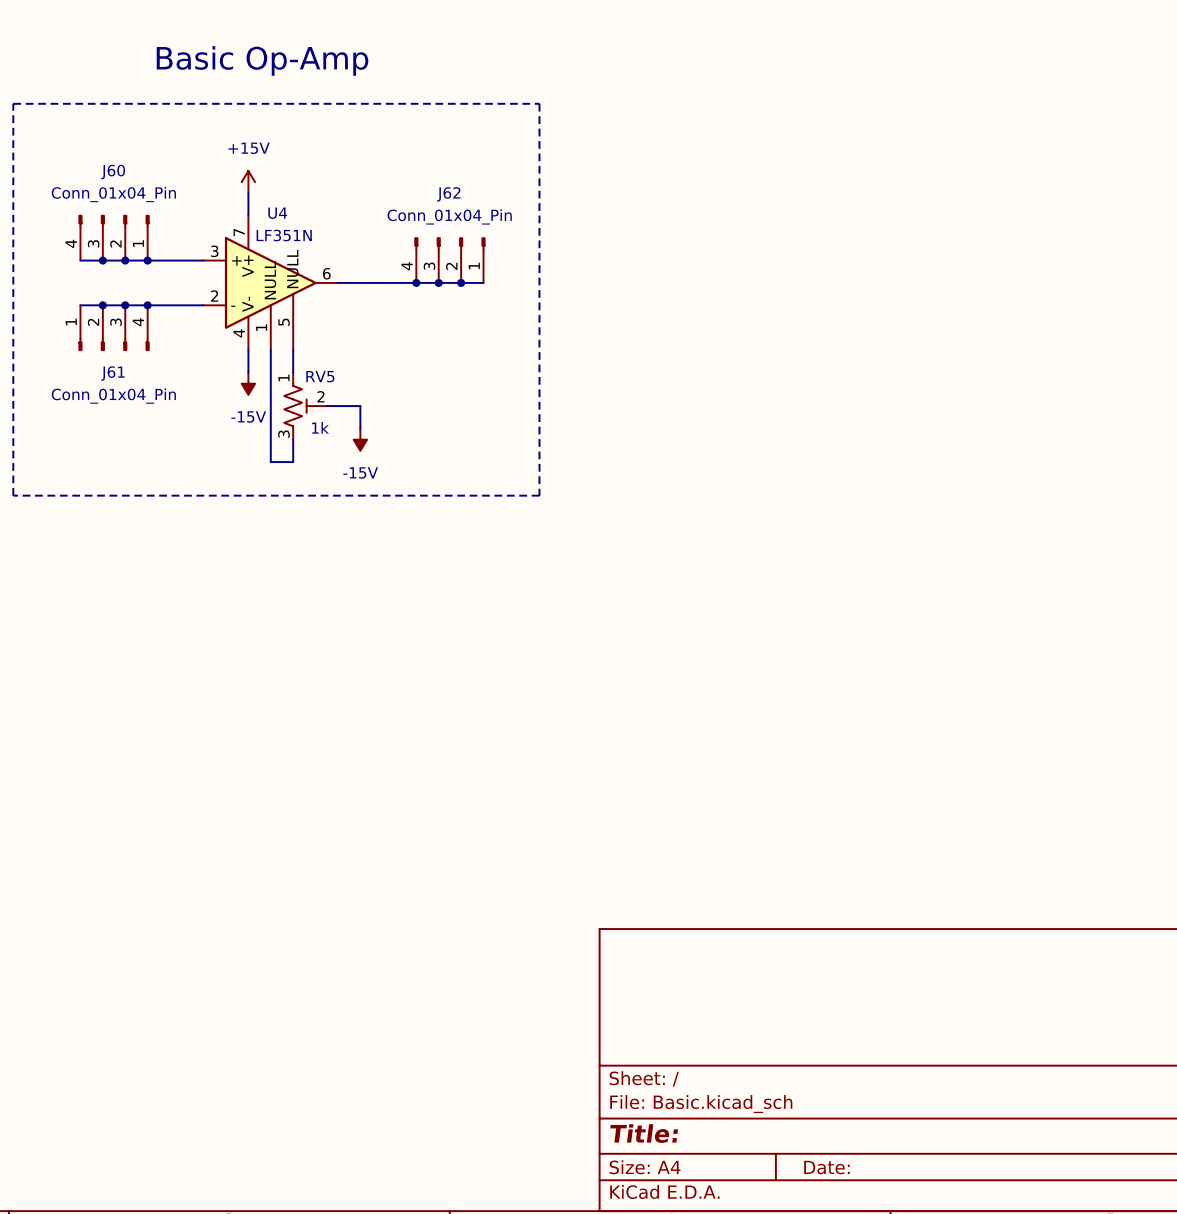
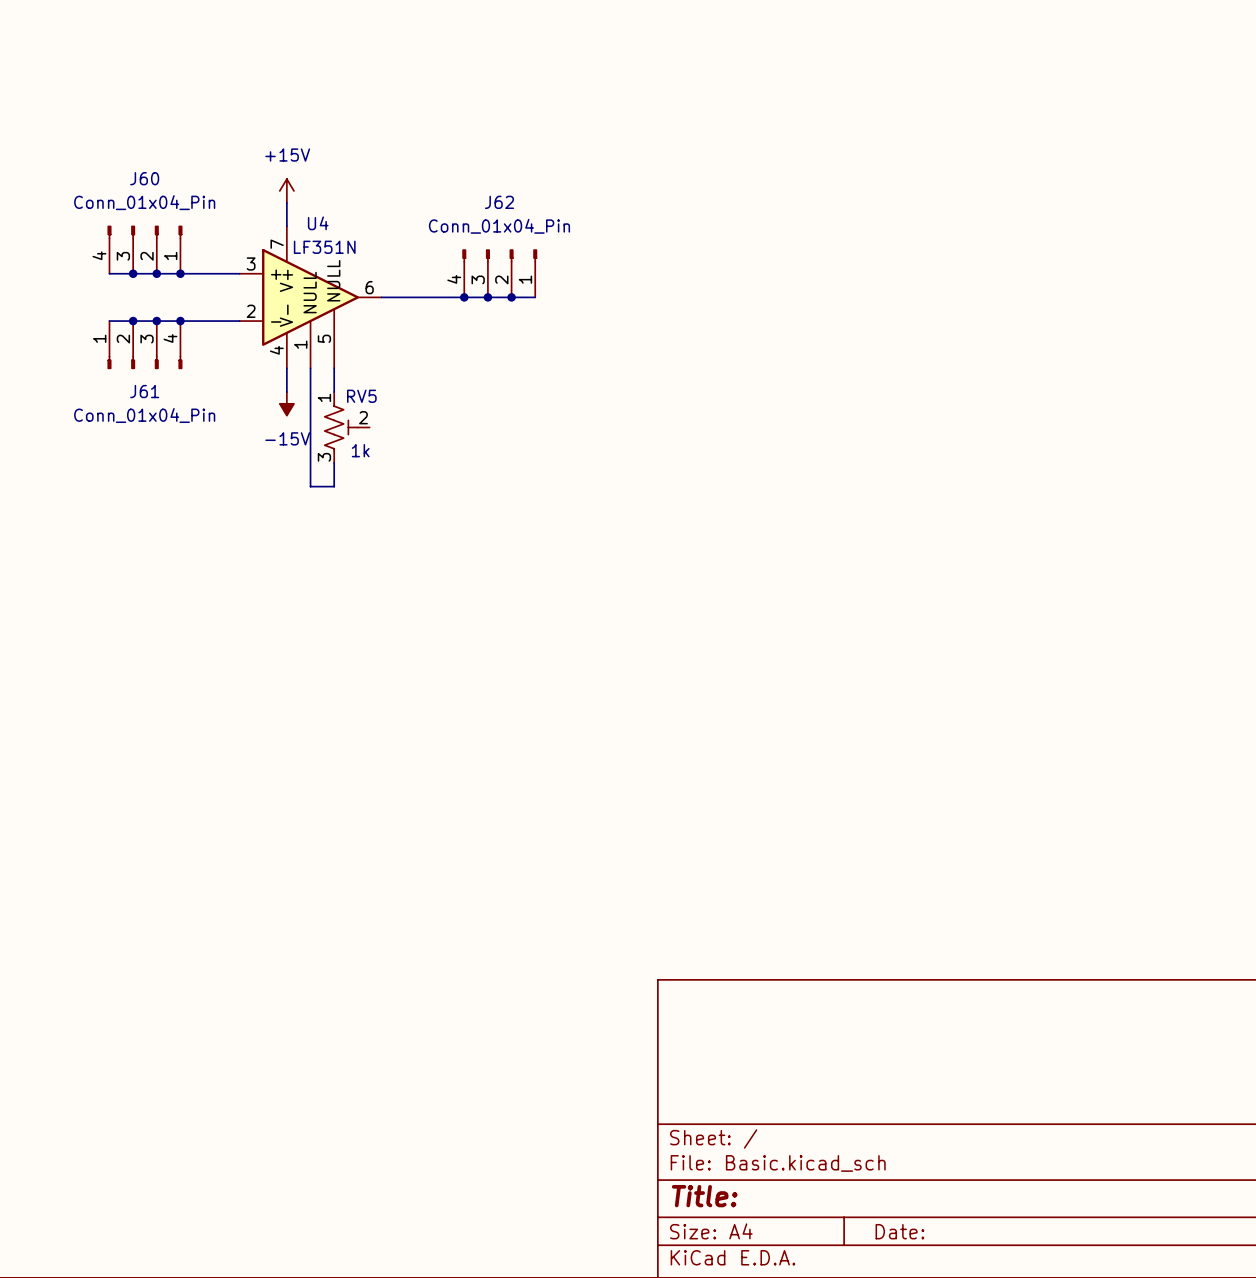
text: Basic Op-Amp (262, 60) -> none
line: (13, 103) (539, 103) (539, 495) (13, 495) (13, 103) -> none
wire: (326, 406) (360, 406) (360, 428) -> none
power symbol: -15V (360, 439) -> none

